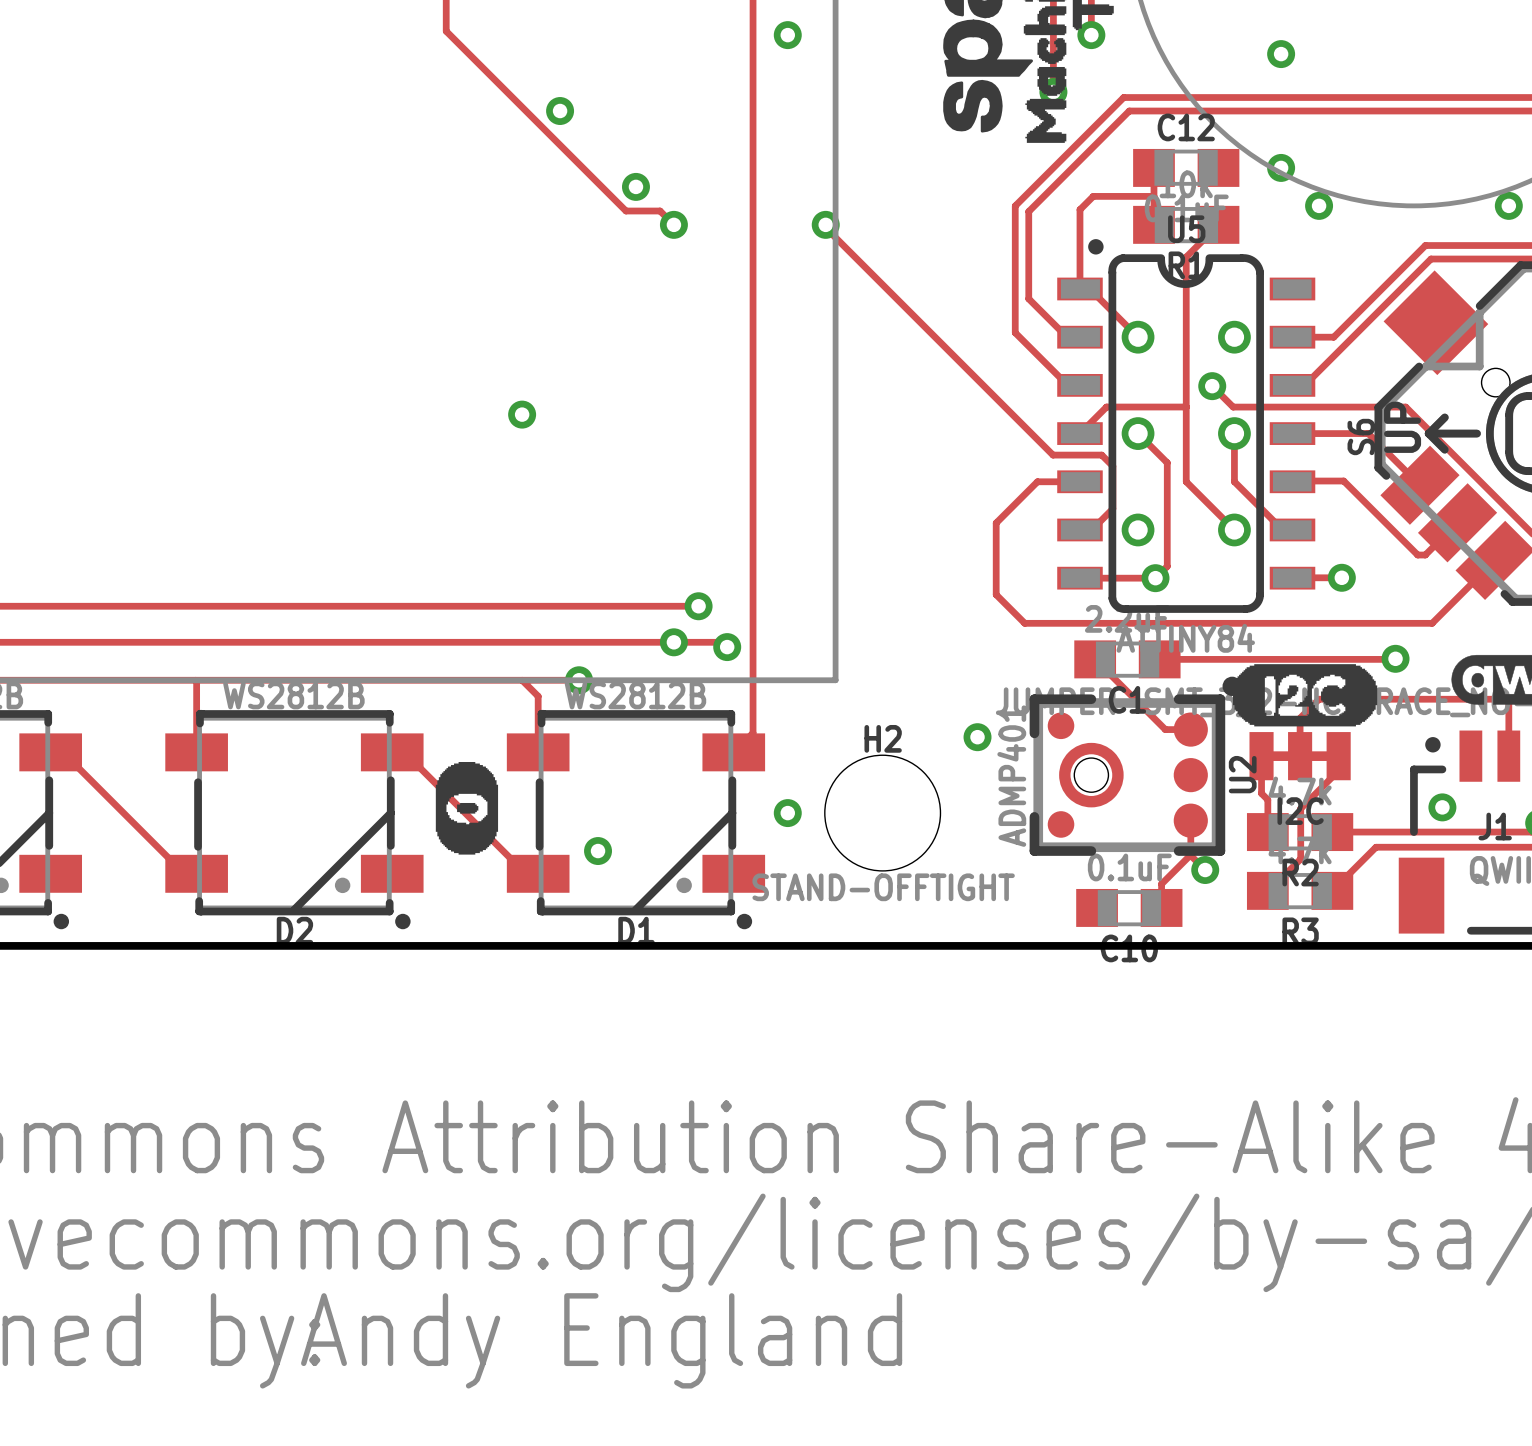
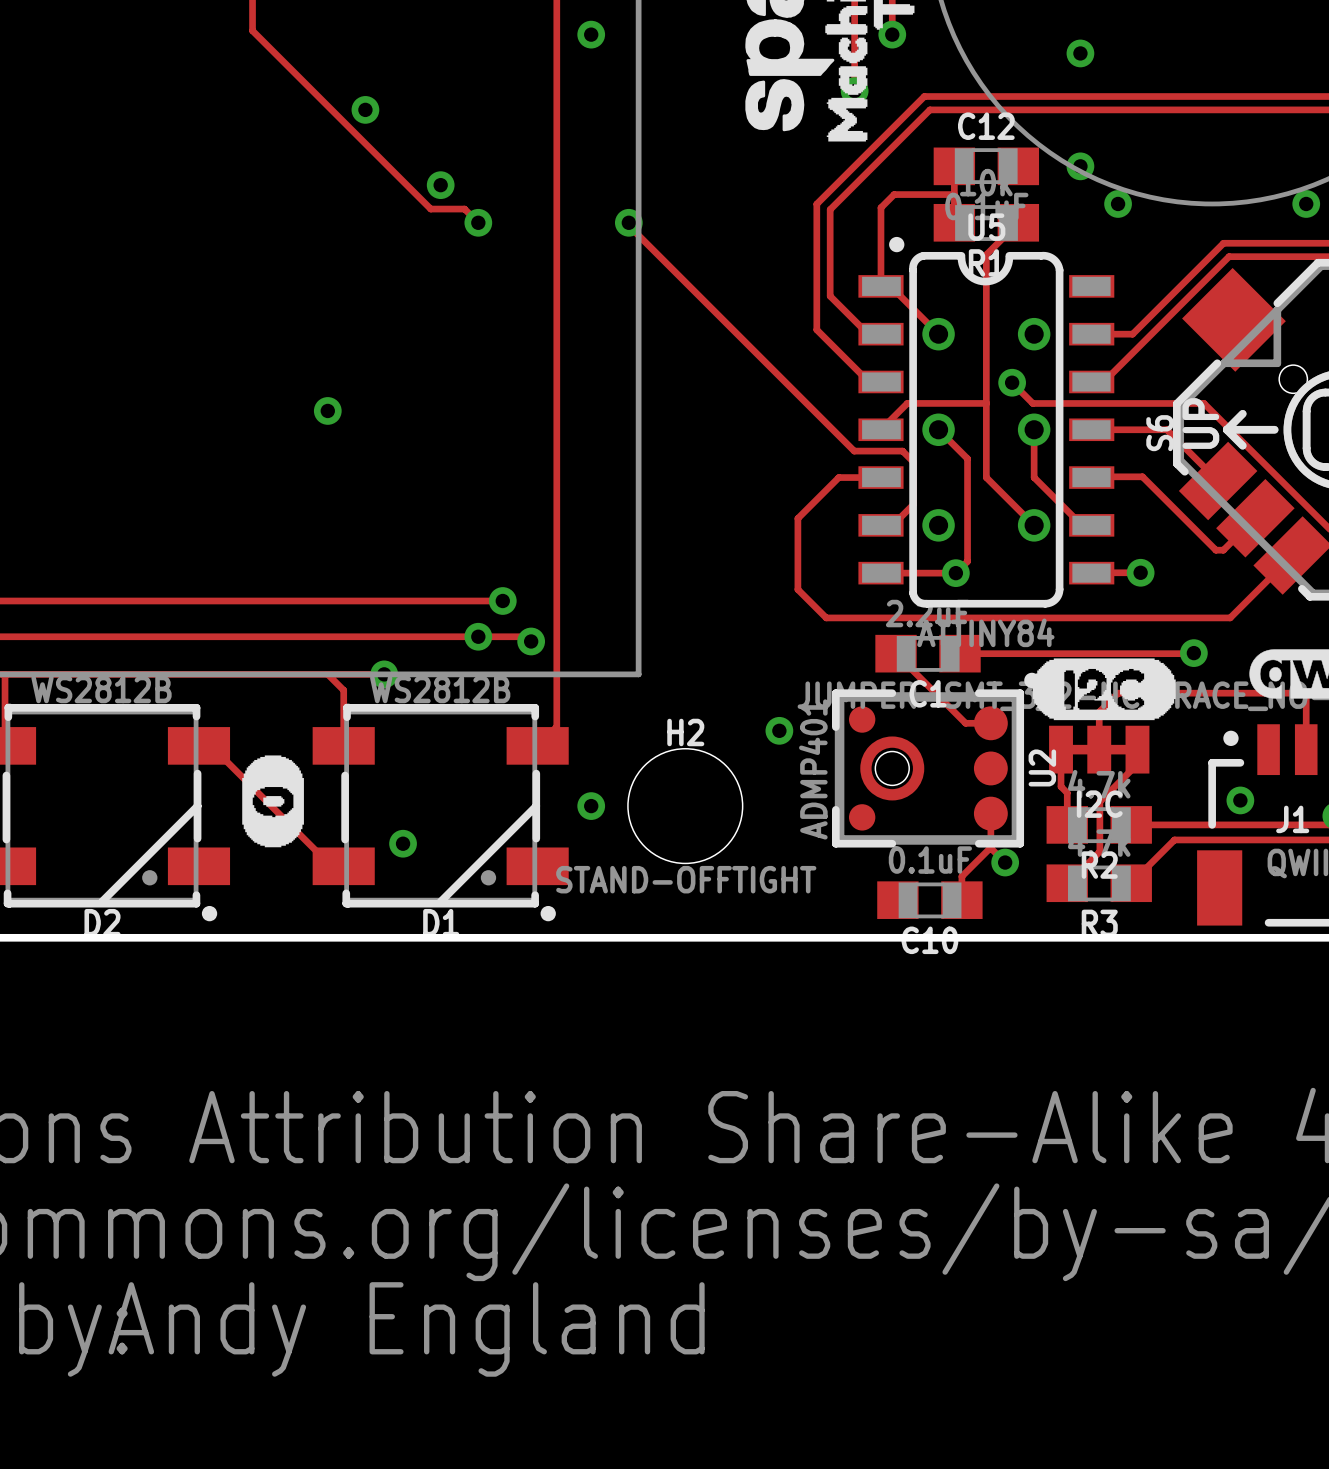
U2 footprint: [1029, 676, 1242, 856] -> [832, 672, 1040, 848]

